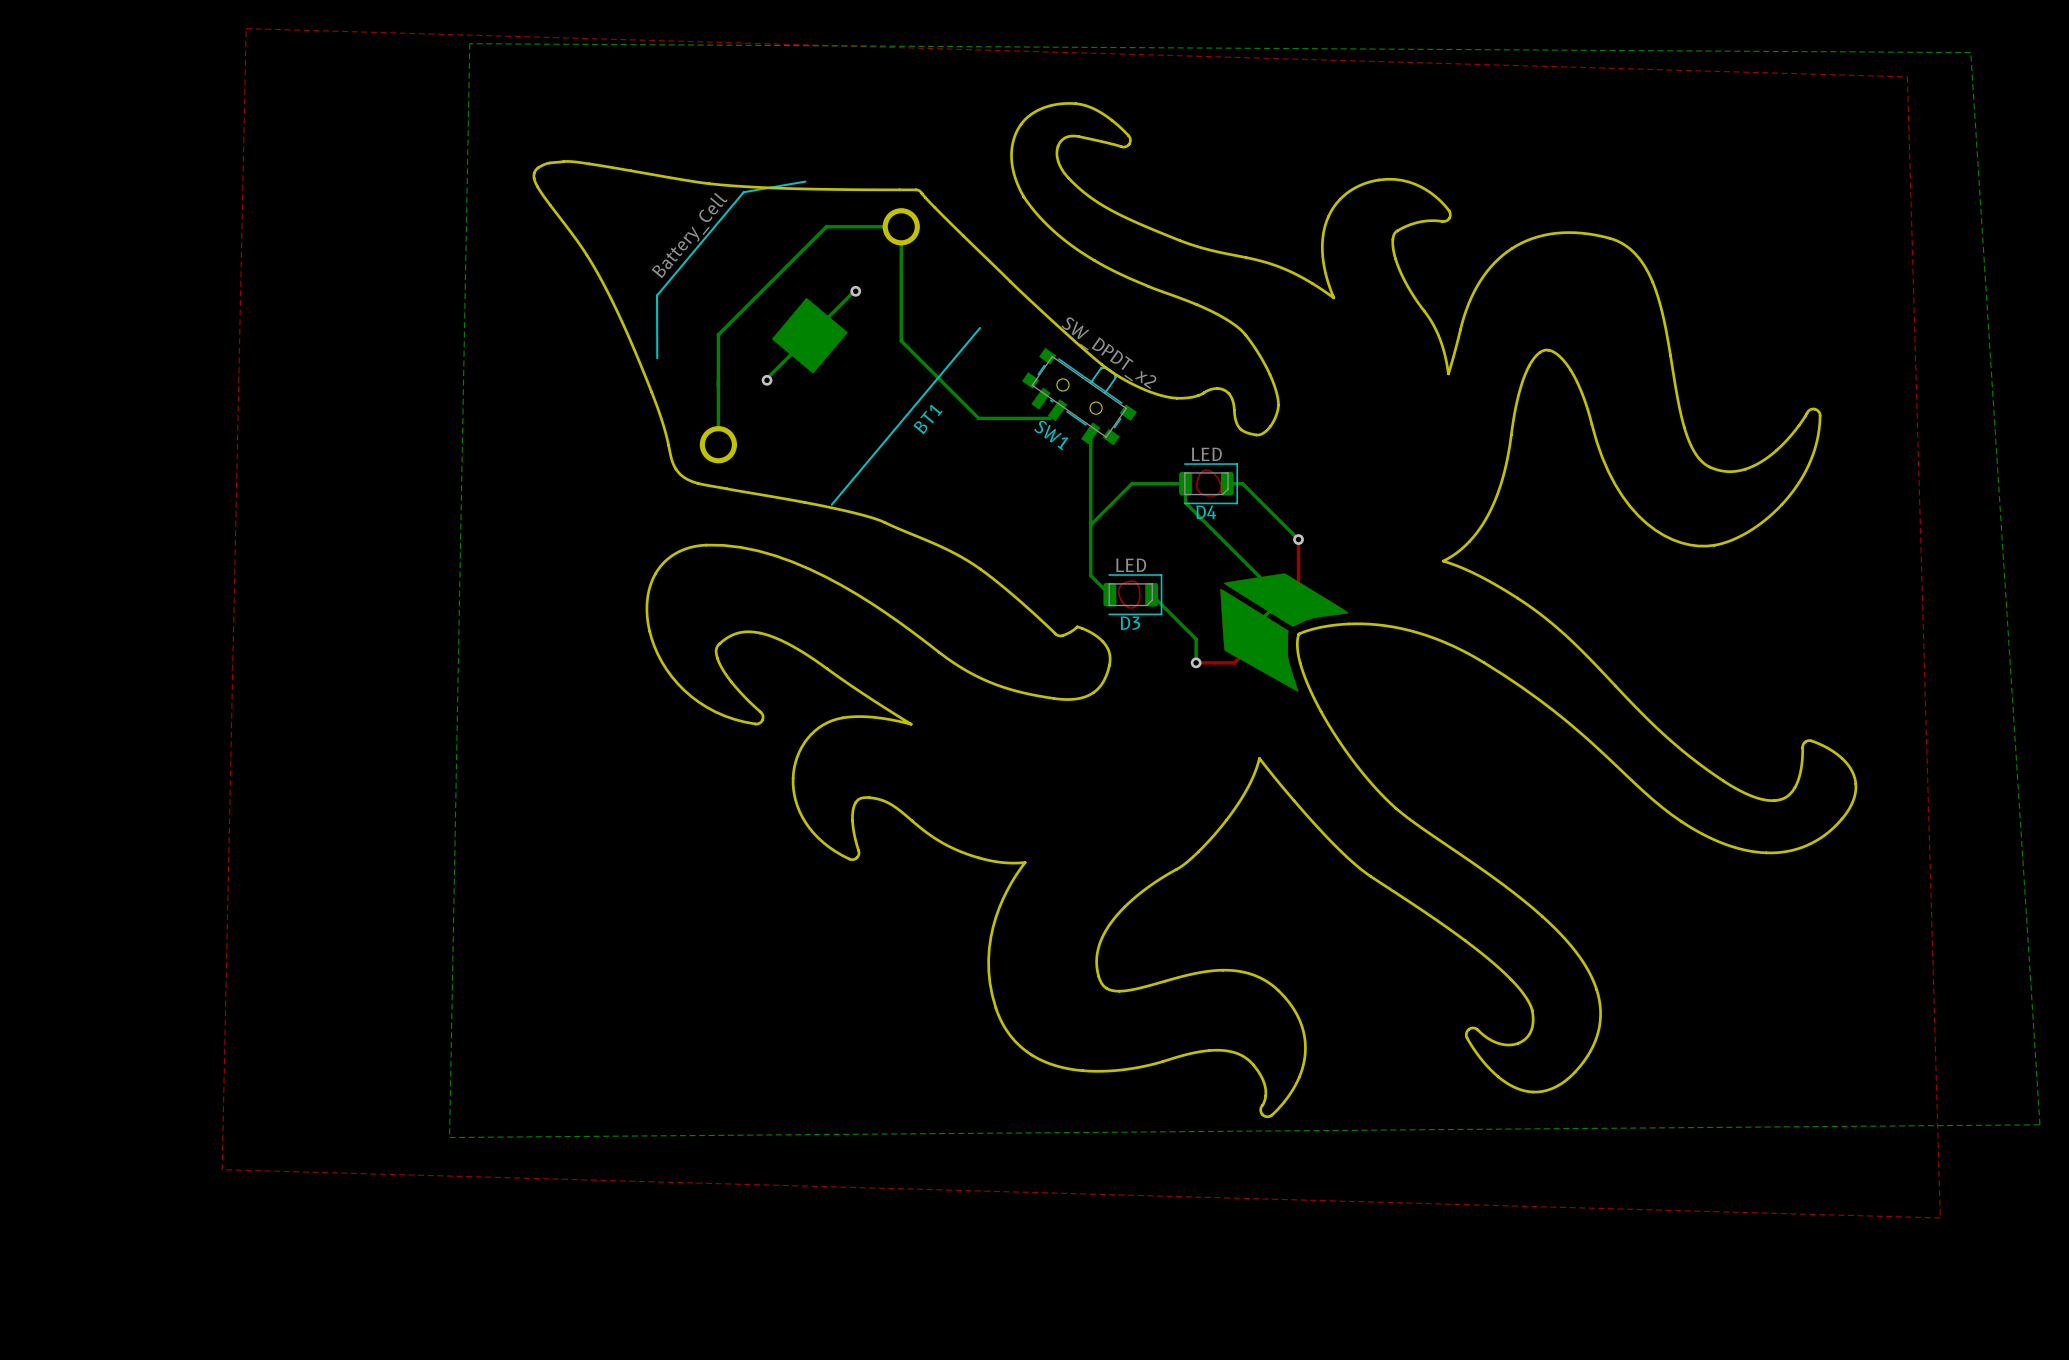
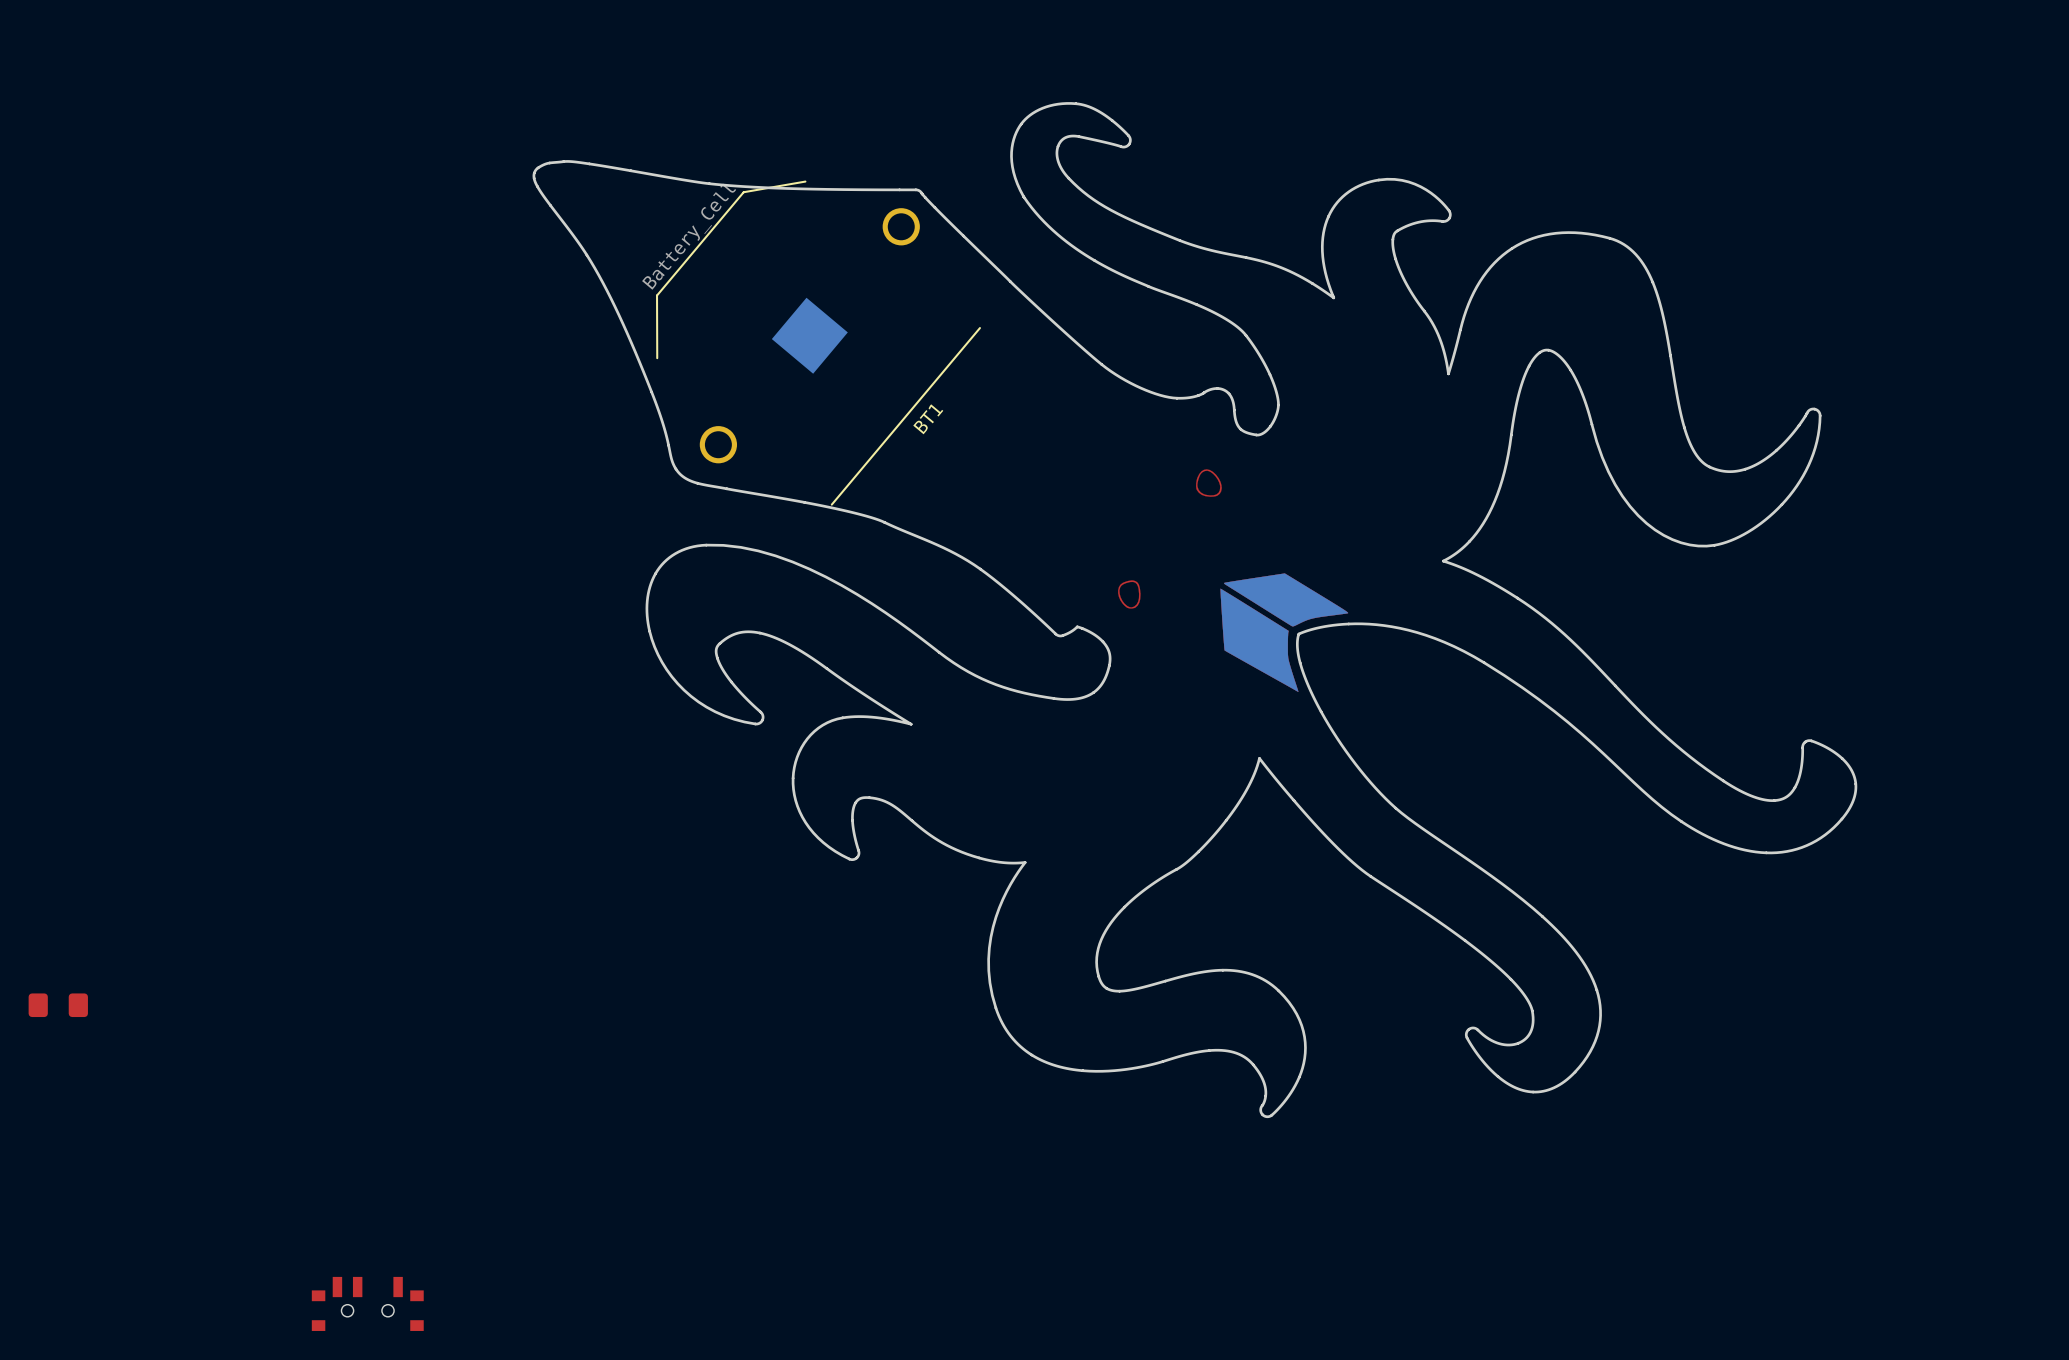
top zone outline: (246, 28) (222, 1169) (1940, 1217) (1907, 76) (246, 28) -> none
bottom zone outline: (469, 43) (449, 1137) (2039, 1124) (1970, 52) (469, 43) -> none
bottom track: (855, 291) (767, 380) -> none
via: (855, 291) -> none
via: (767, 380) -> none
SW1: SW_DPDT_x2 (1079, 396) -> none
bottom track: (1057, 410) (1049, 418) (978, 418) (901, 340) (901, 226) (826, 226) (718, 334) (718, 444) -> none
bottom track: (1090, 433) (1090, 575) (1109, 594) -> none
D4: LED (1208, 483) -> none
bottom track: (1227, 483) (1242, 483) (1298, 539) -> none
bottom track: (1090, 524) (1131, 483) (1185, 483) (1185, 502) (1281, 599) (1257, 623) (1257, 637) -> none
top track: (1298, 539) (1298, 583) (1283, 597) -> none
via: (1298, 539) -> none
D3: LED (1132, 594) -> none
bottom track: (1151, 594) (1196, 639) (1196, 662) -> none
top track: (1257, 639) (1234, 662) (1196, 662) -> none
via: (1196, 662) -> none
part: none -> (58, 1005)
part: none -> (367, 1303)

